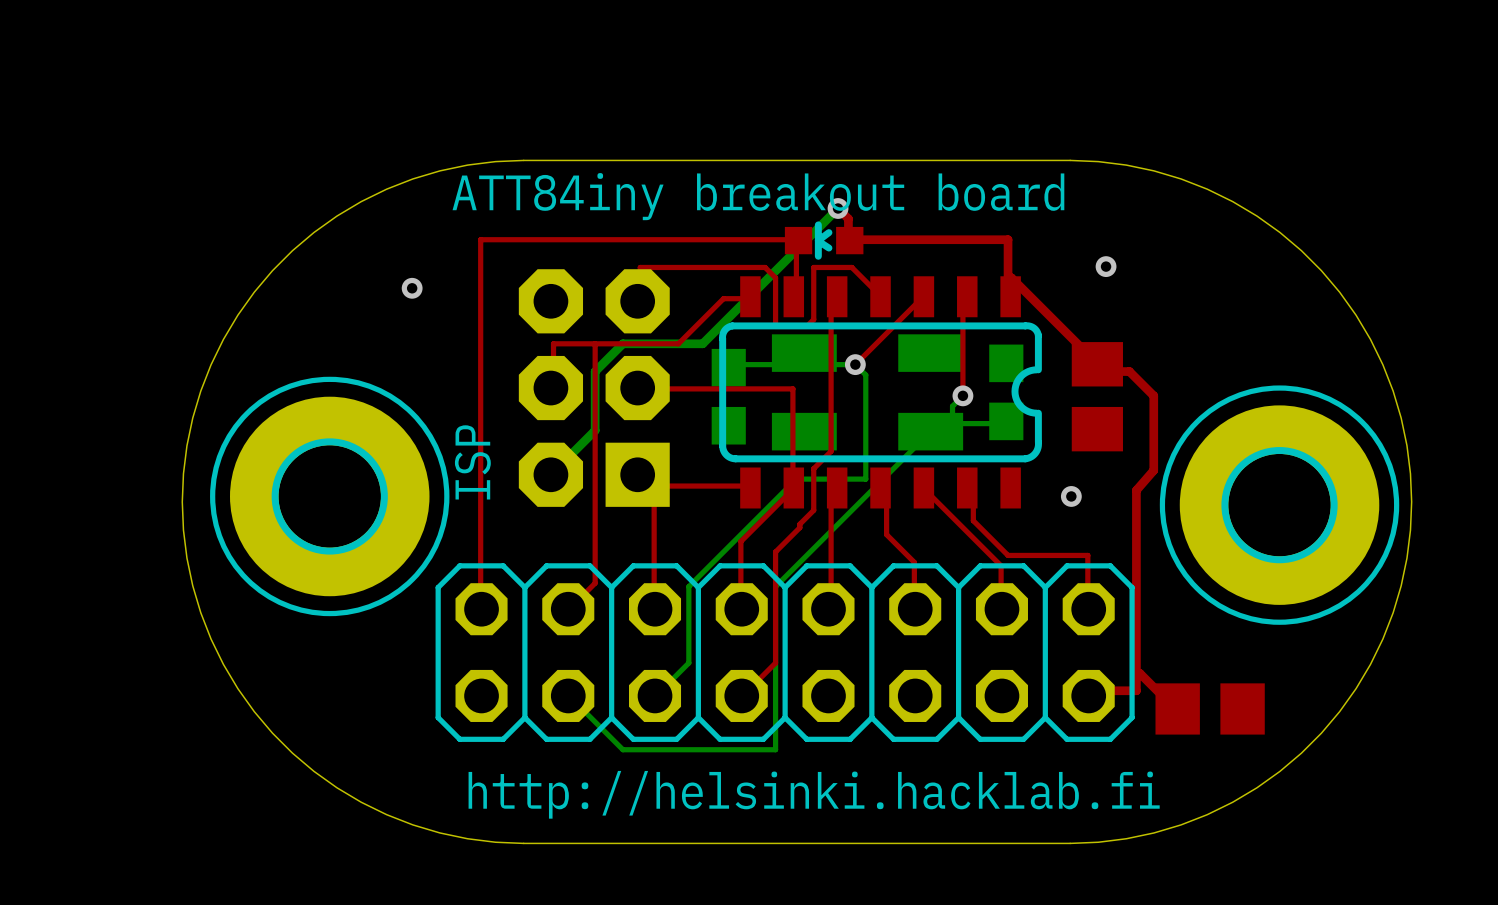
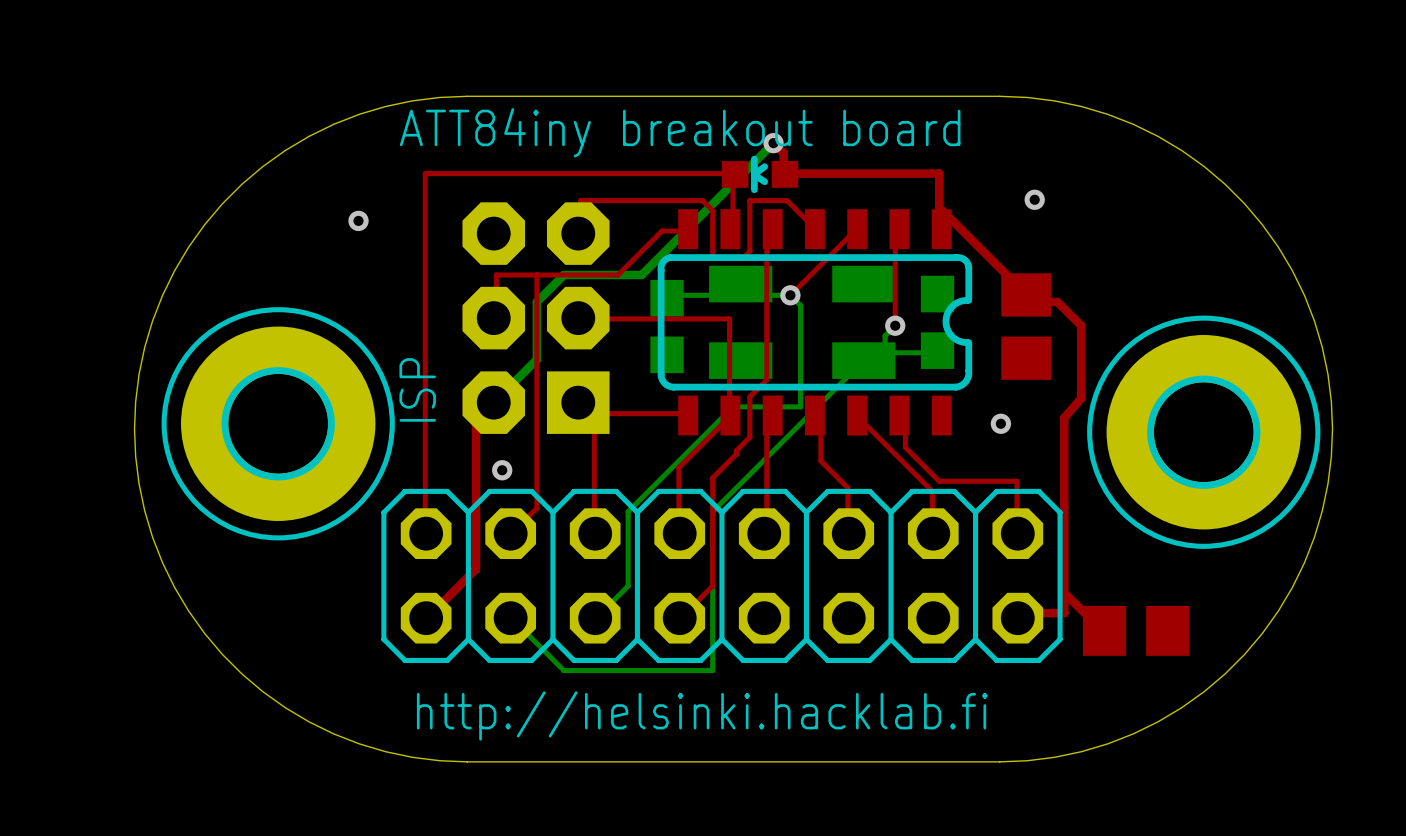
top track: none -> (493, 402) (476, 420) (476, 569) (426, 618)
via: none -> (502, 470)

